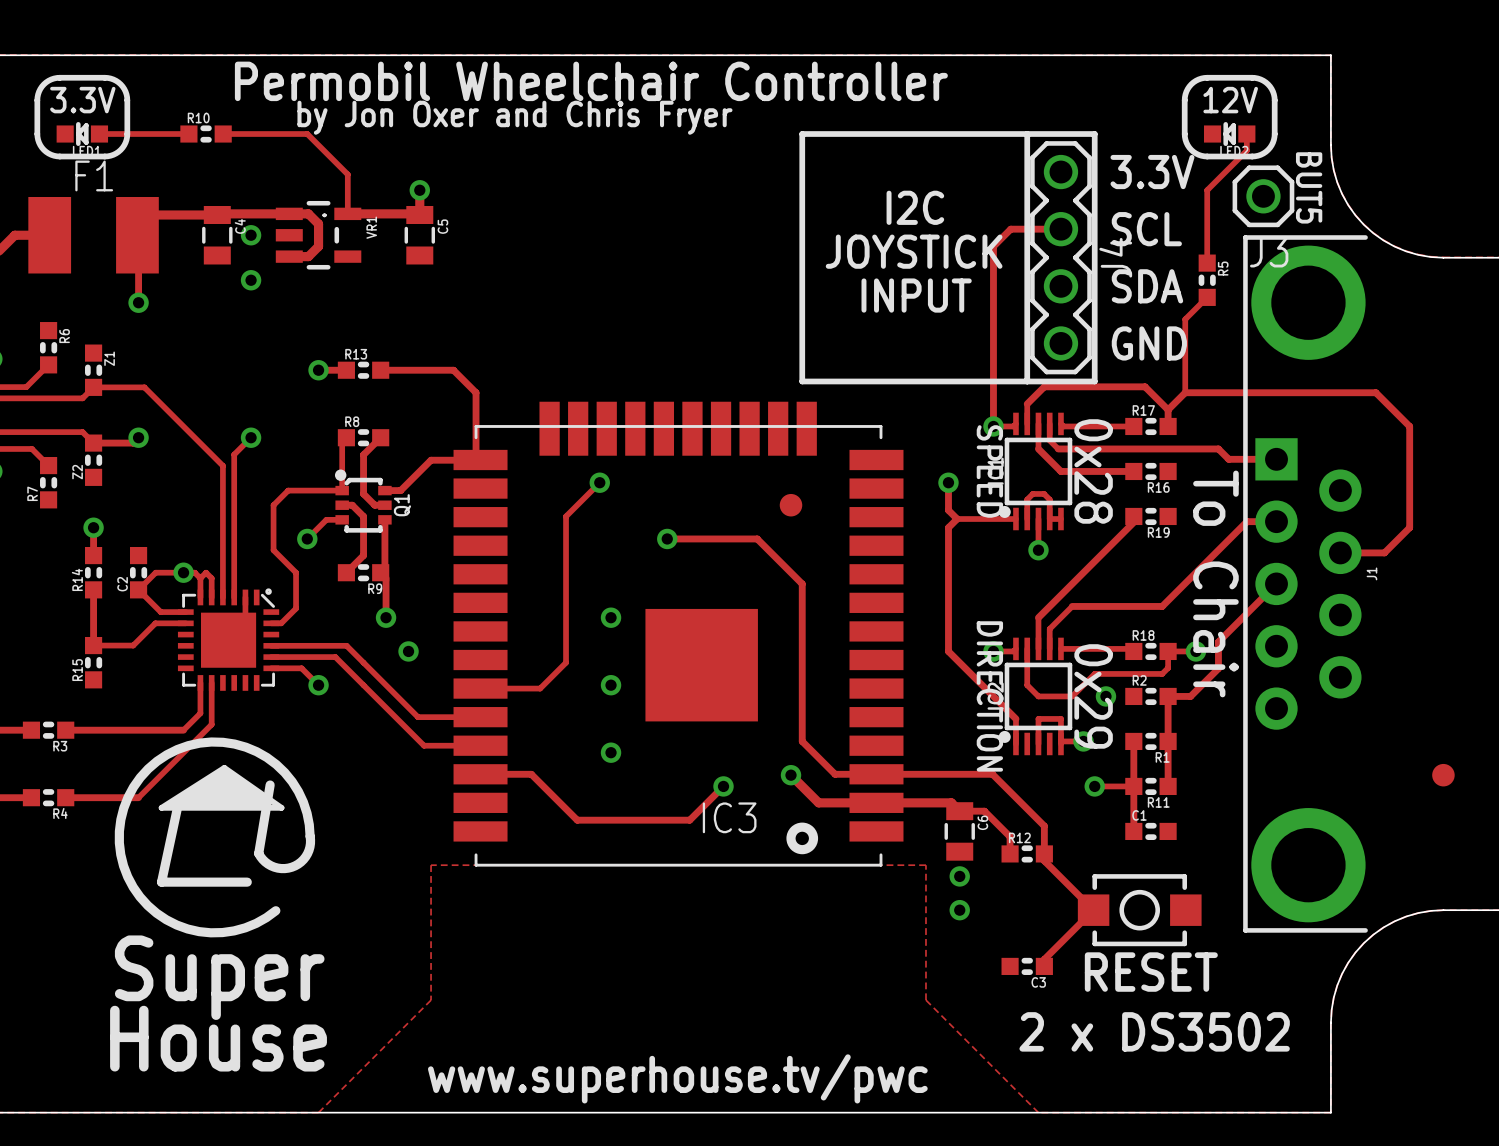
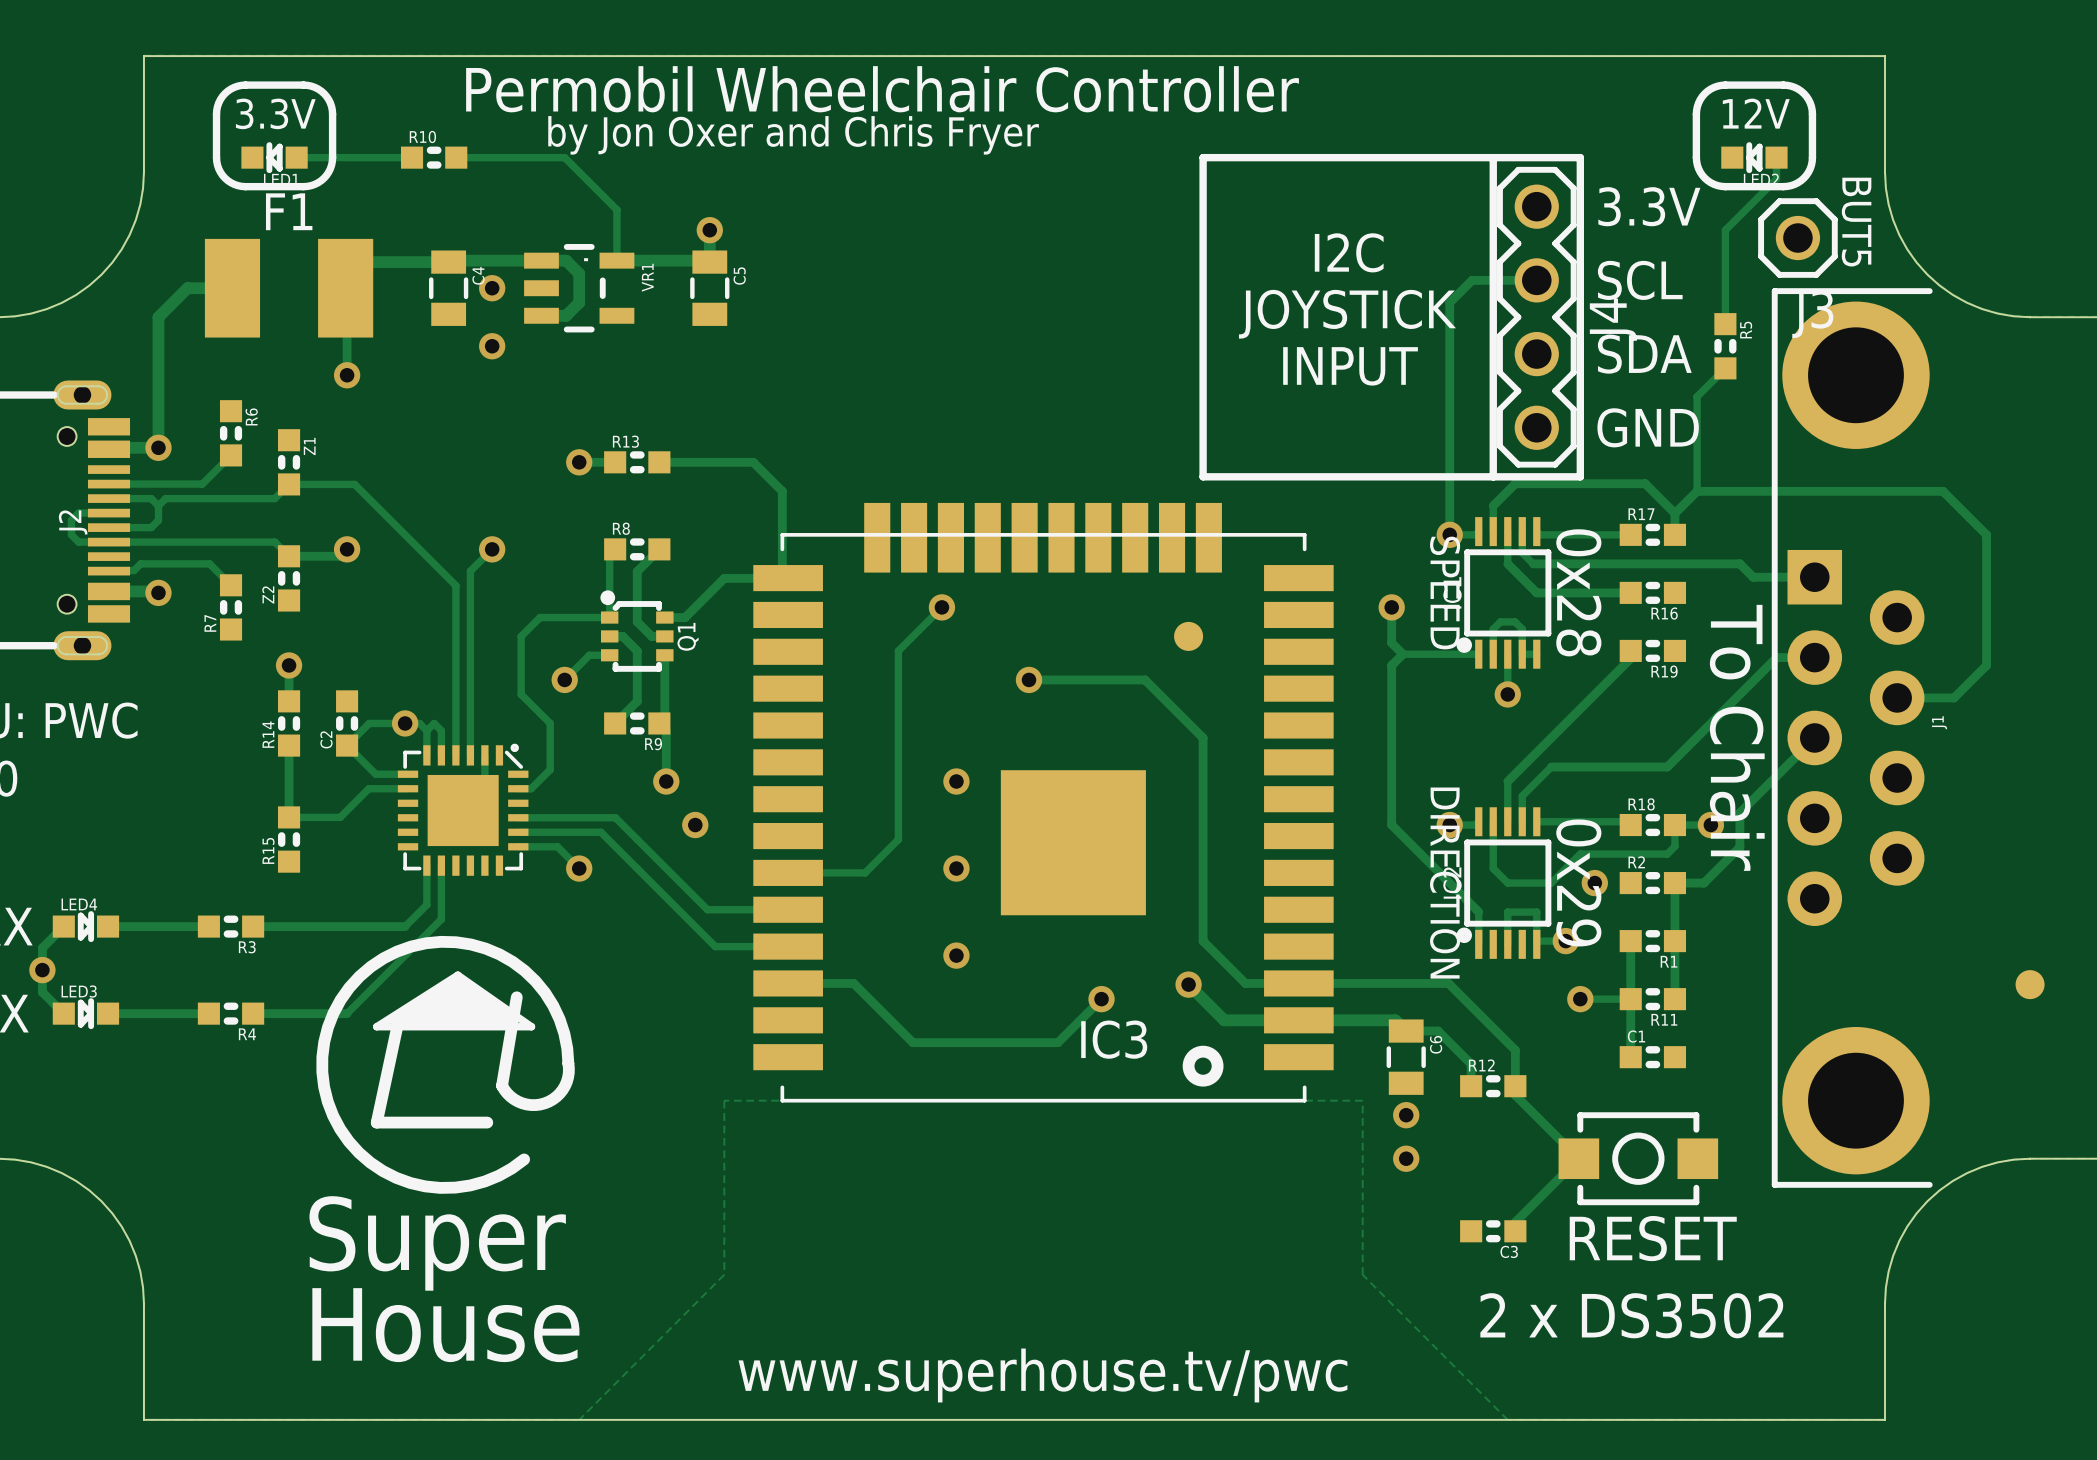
text position: Super (219, 977) -> Super (437, 1243)
text position: House (218, 1038) -> House (445, 1325)

